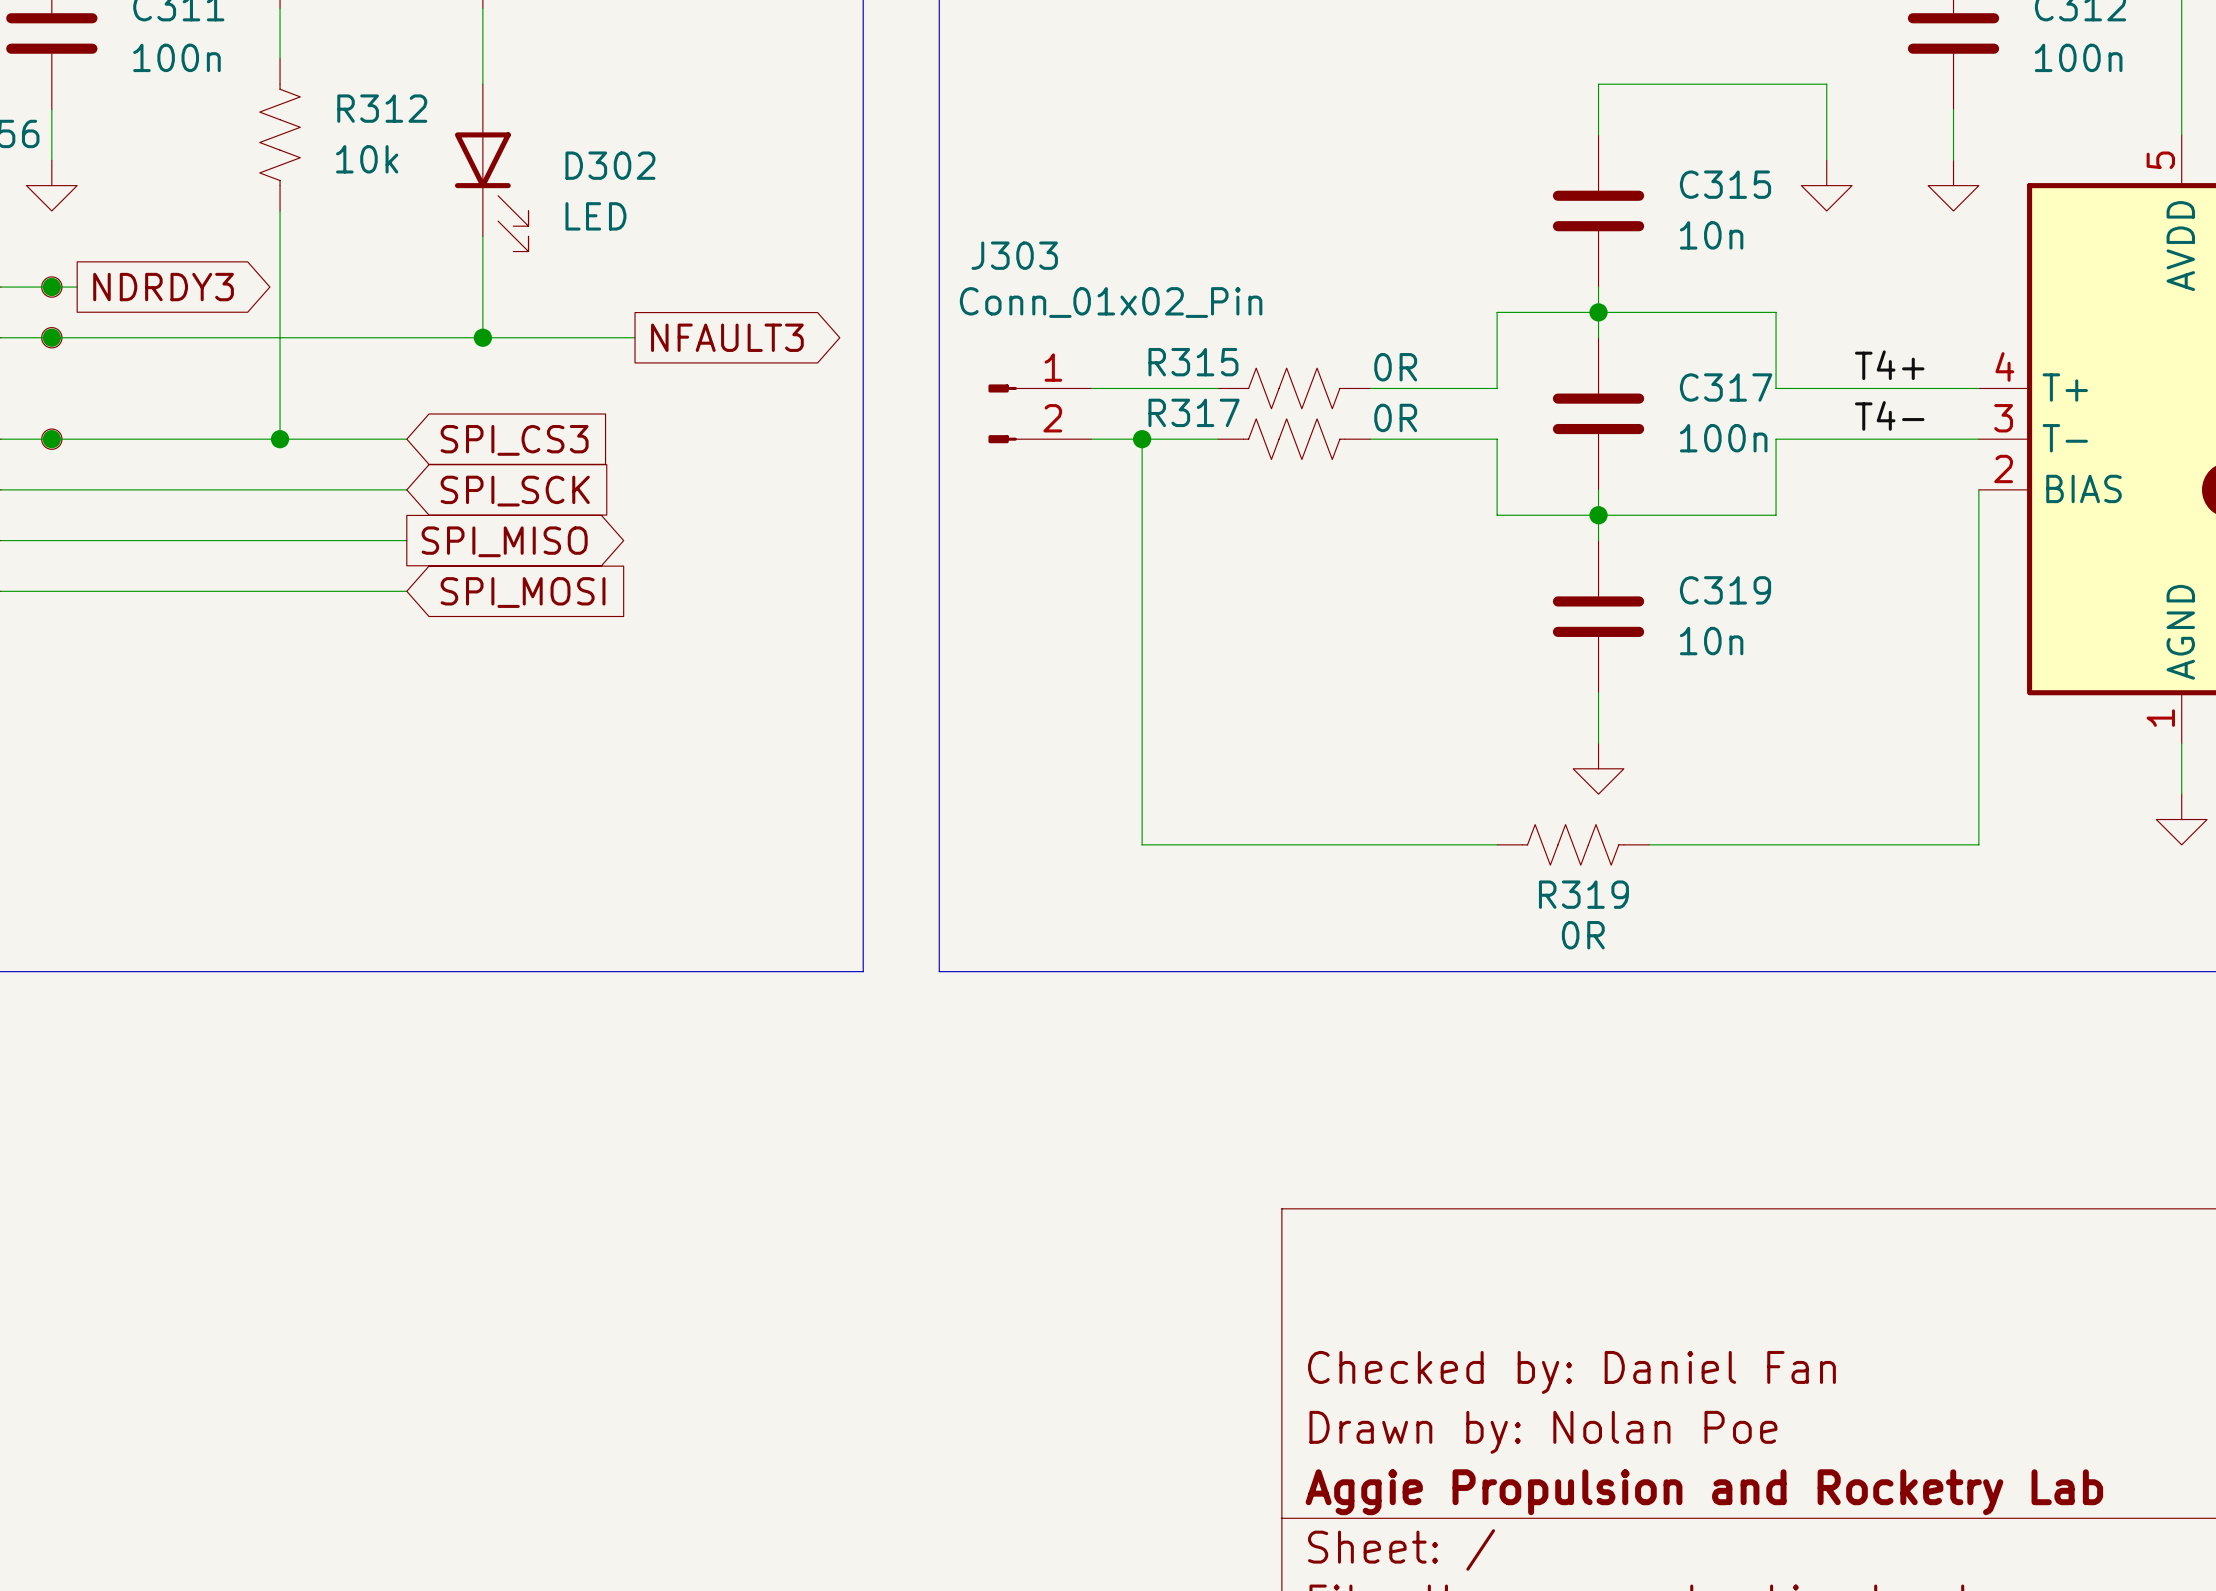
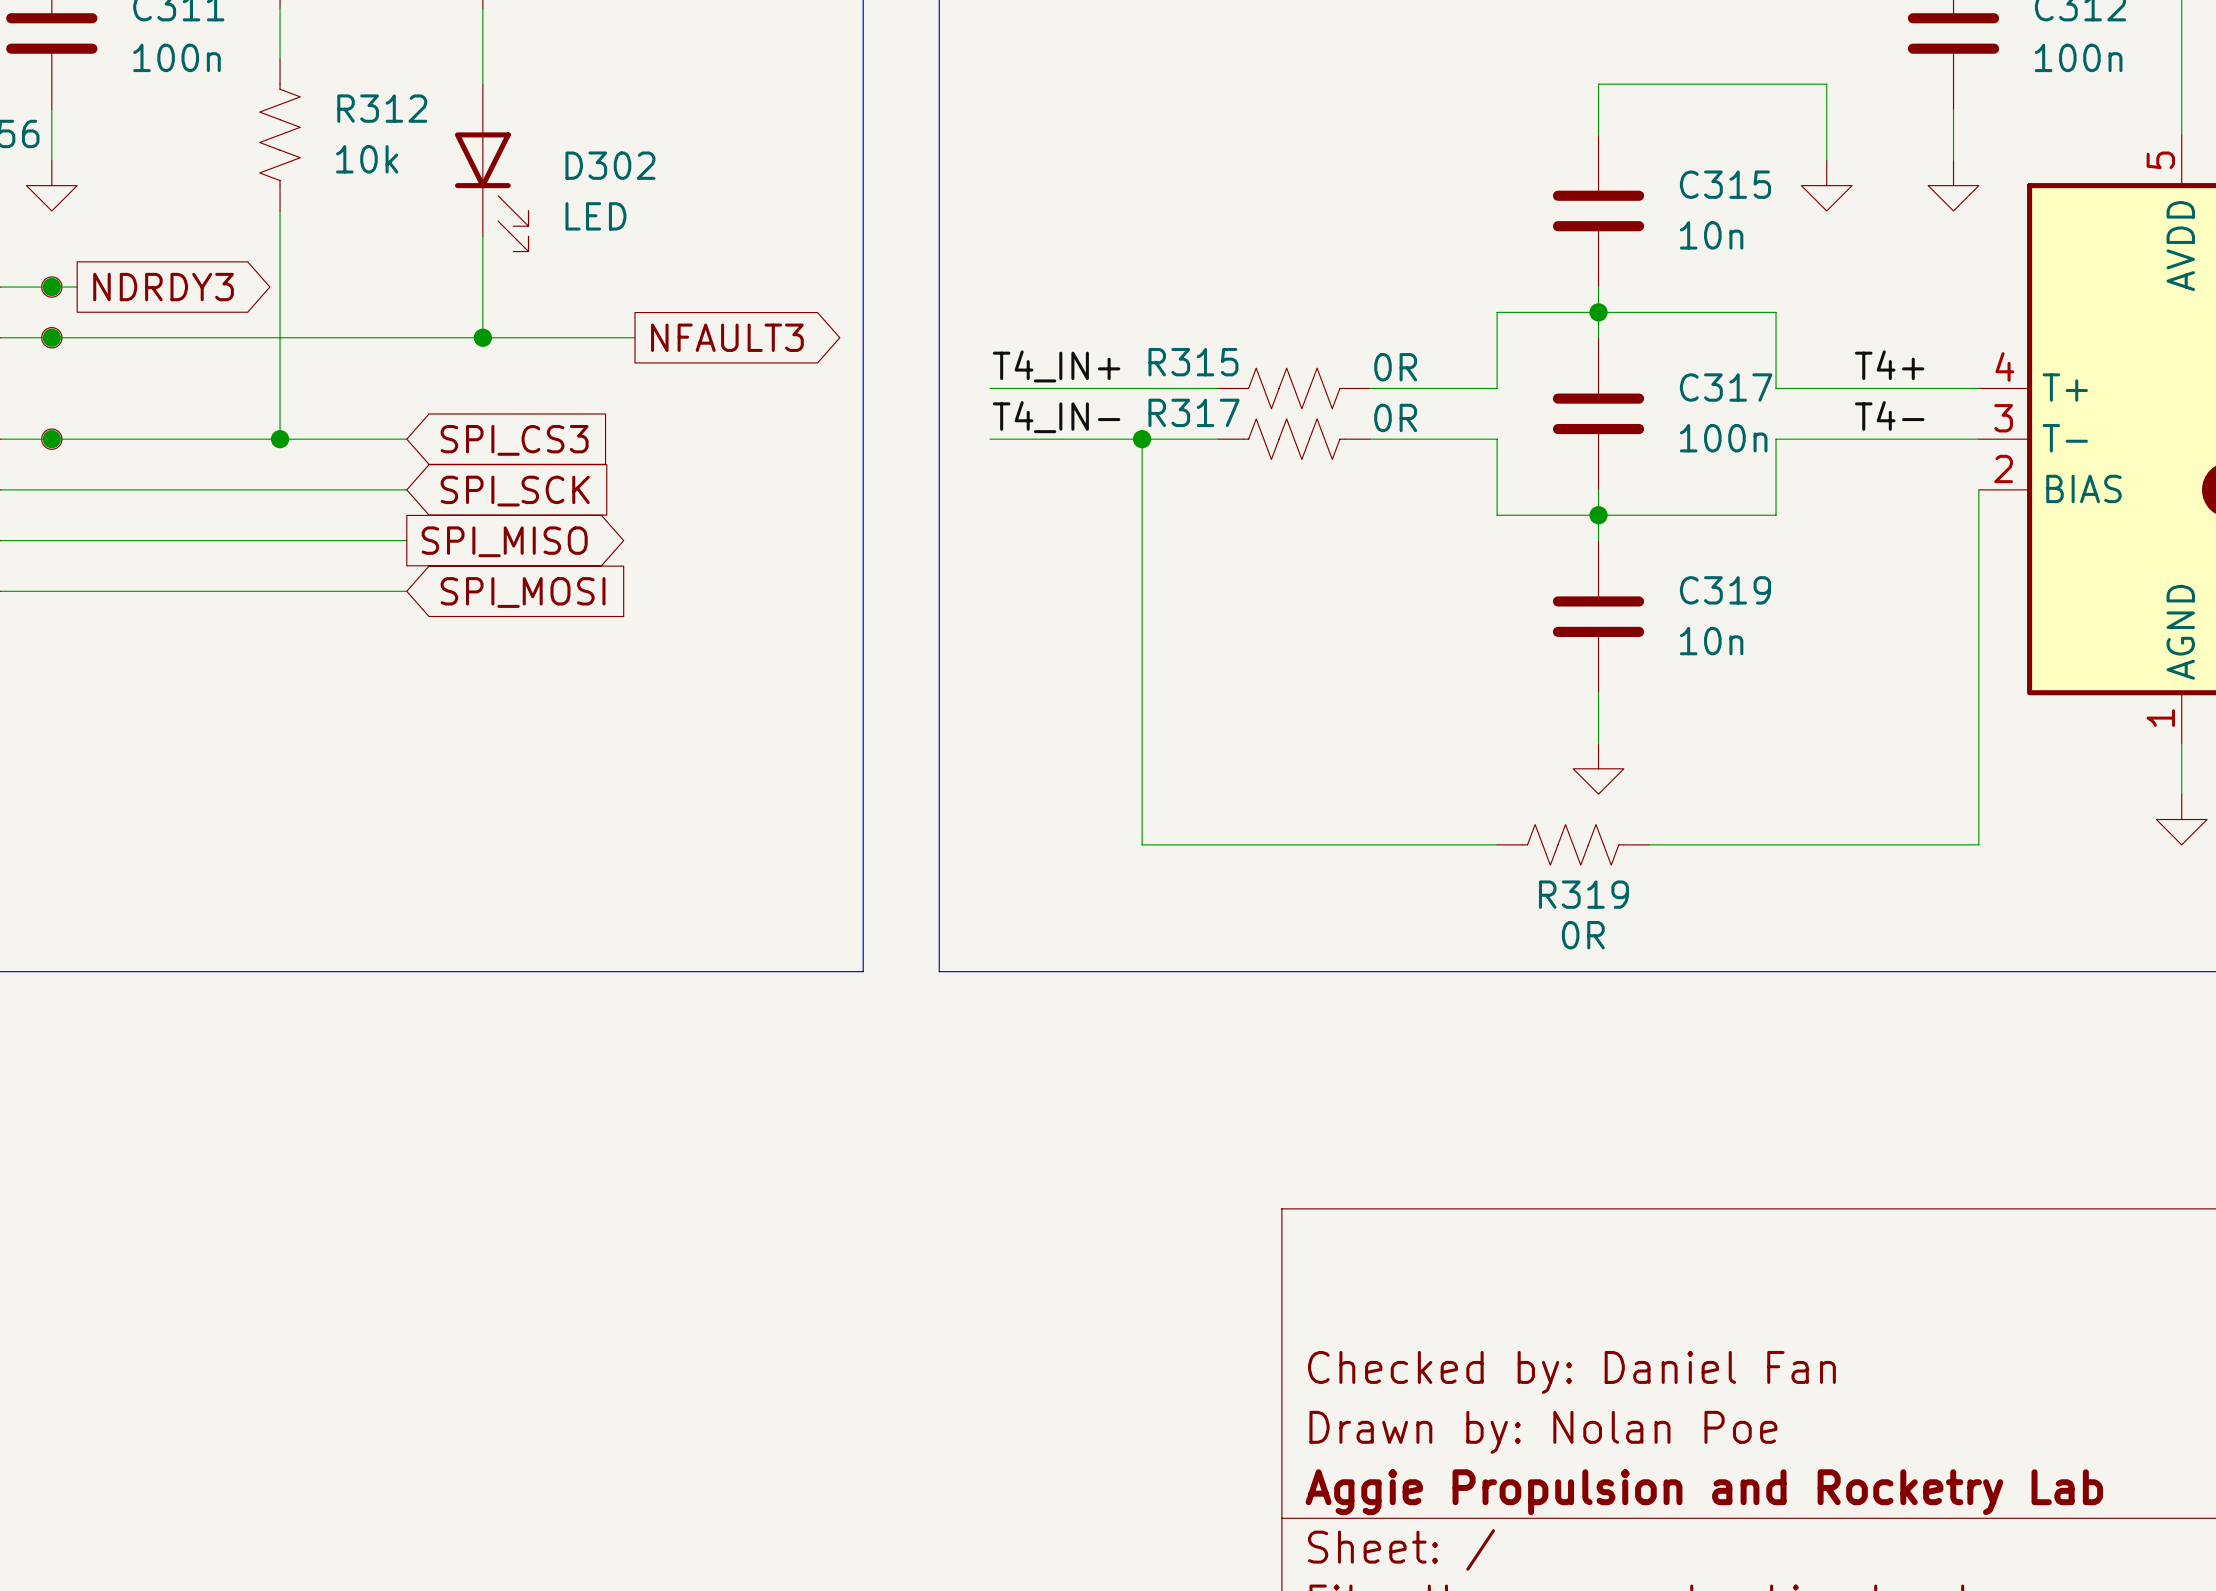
label: none -> T4_IN+ (1056, 366)
J303: Conn_01x02_Pin (1039, 413) -> none
label: none -> T4_IN- (1056, 417)

